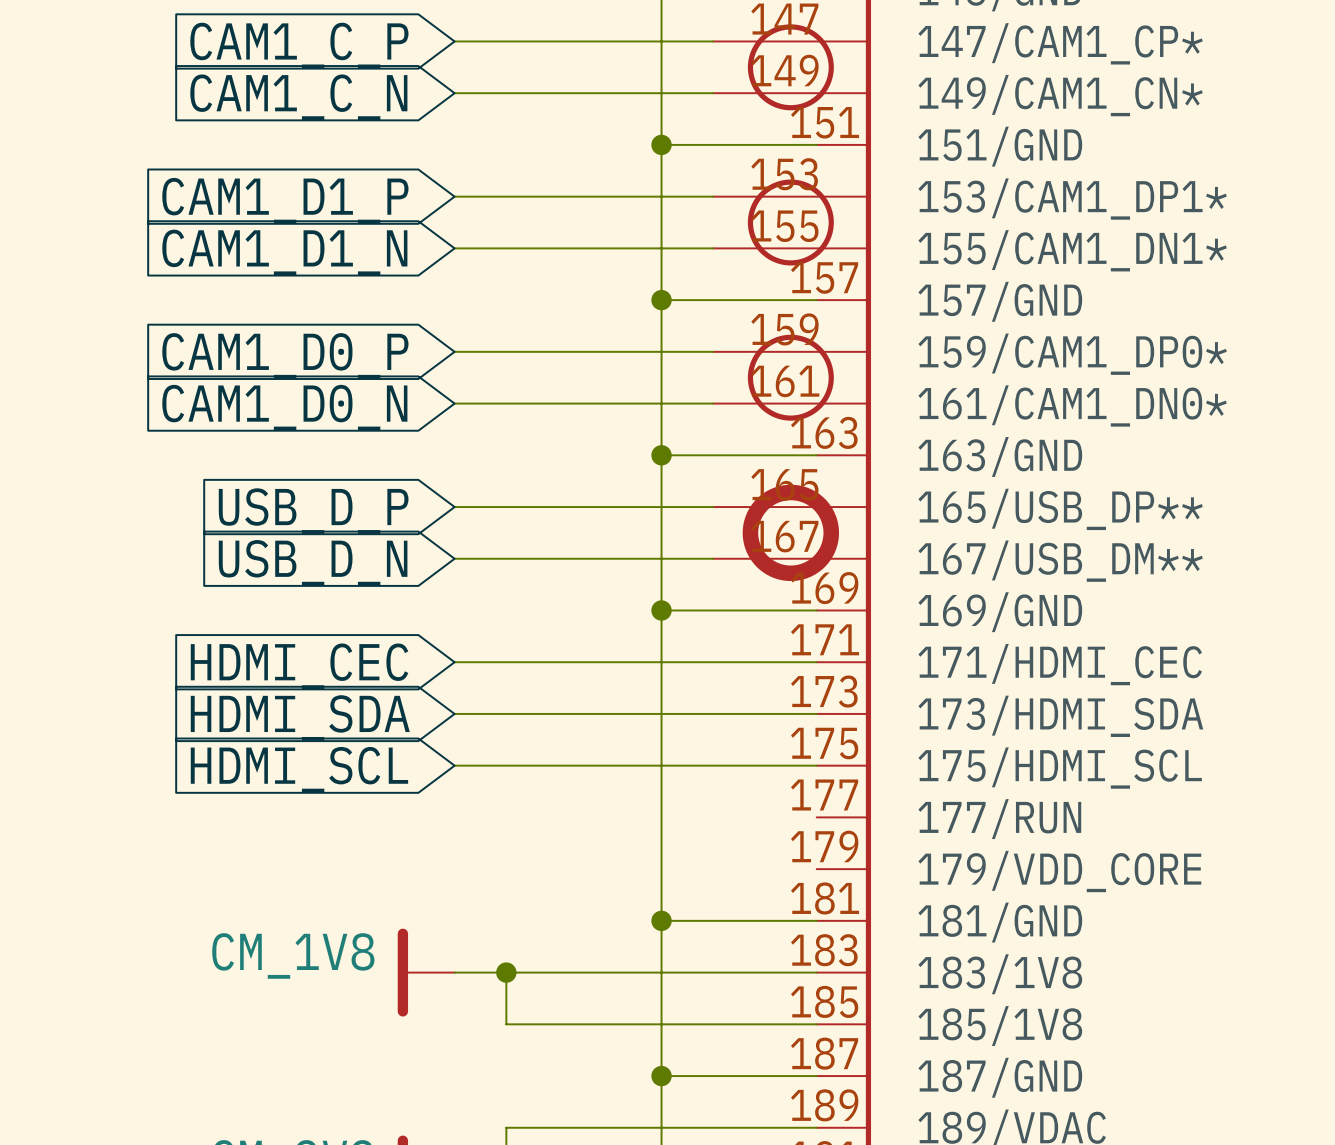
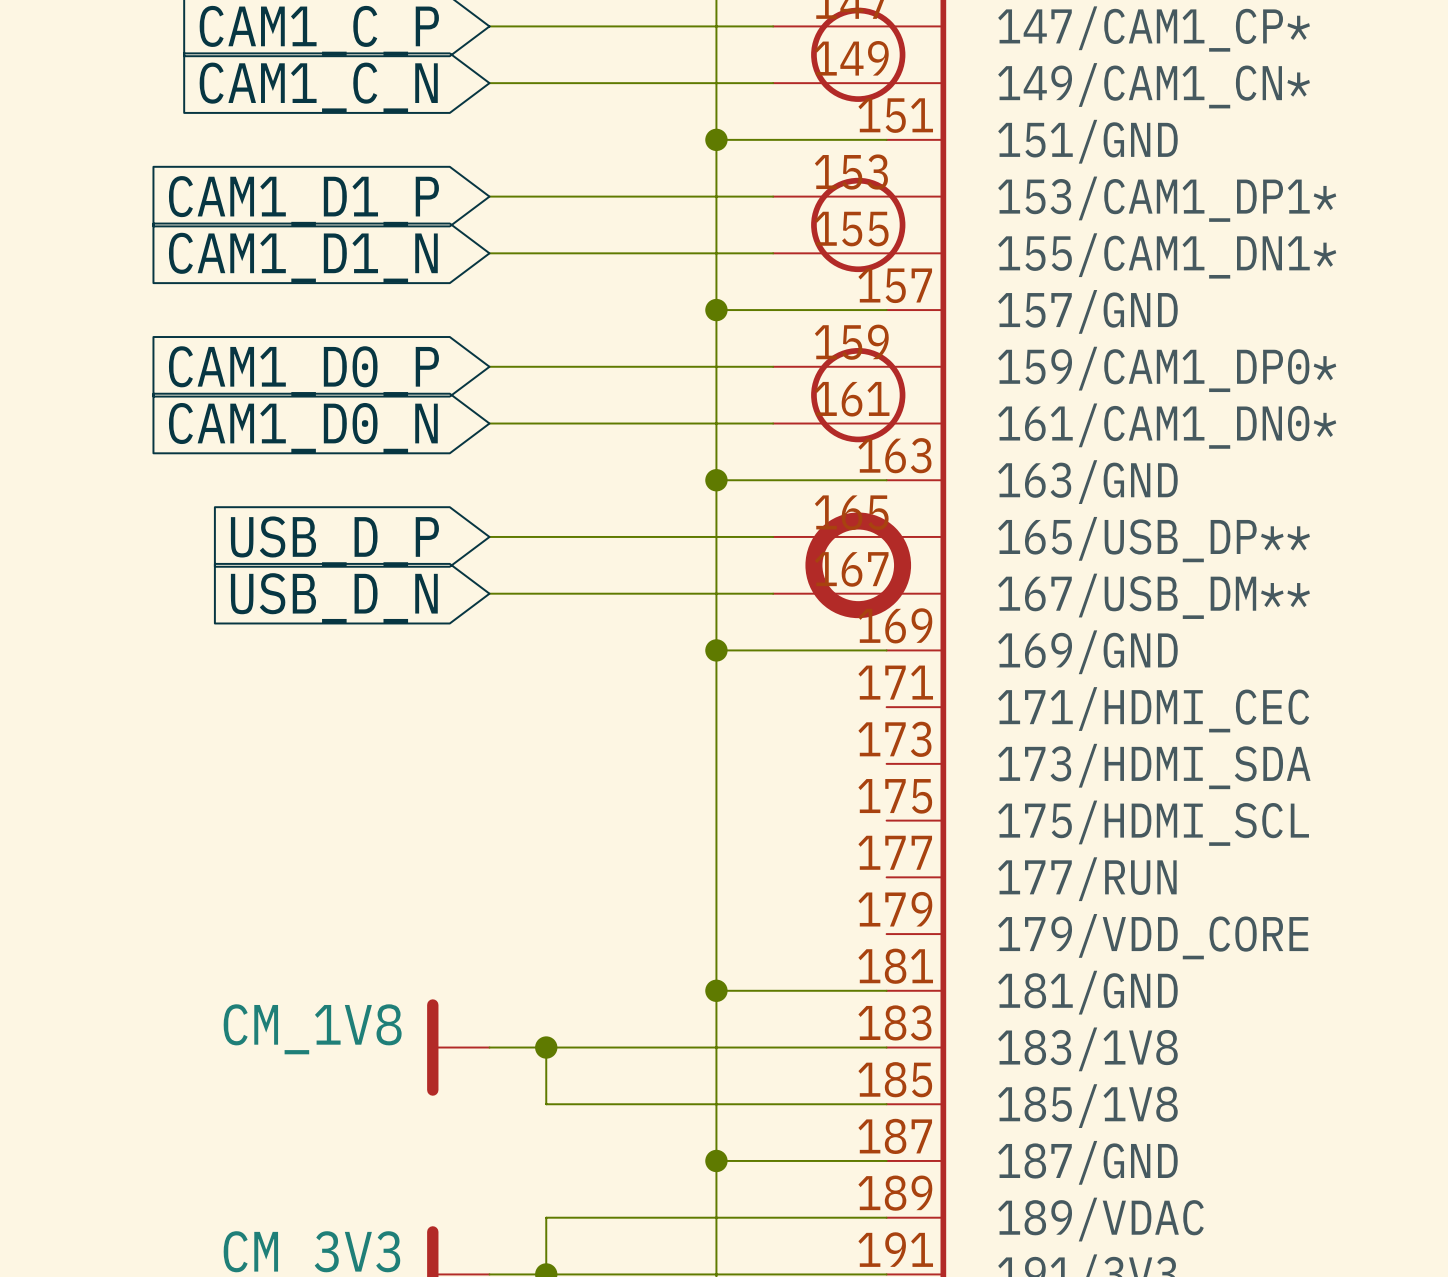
wire: (454, 662) (816, 662) -> none
global label: HDMI_CEC (299, 666) -> none
wire: (454, 713) (816, 713) -> none
global label: HDMI_SDA (300, 718) -> none
wire: (454, 765) (816, 765) -> none
global label: HDMI_SCL (299, 769) -> none

